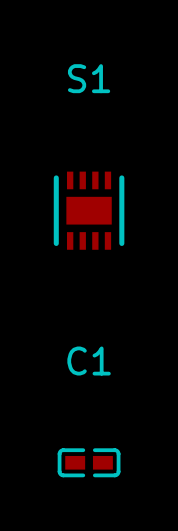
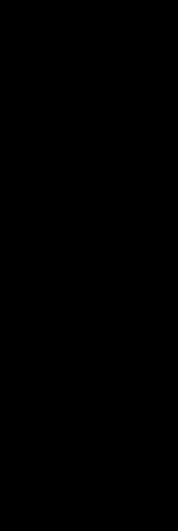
S1: (88, 212) -> none
C1: (89, 462) -> none

